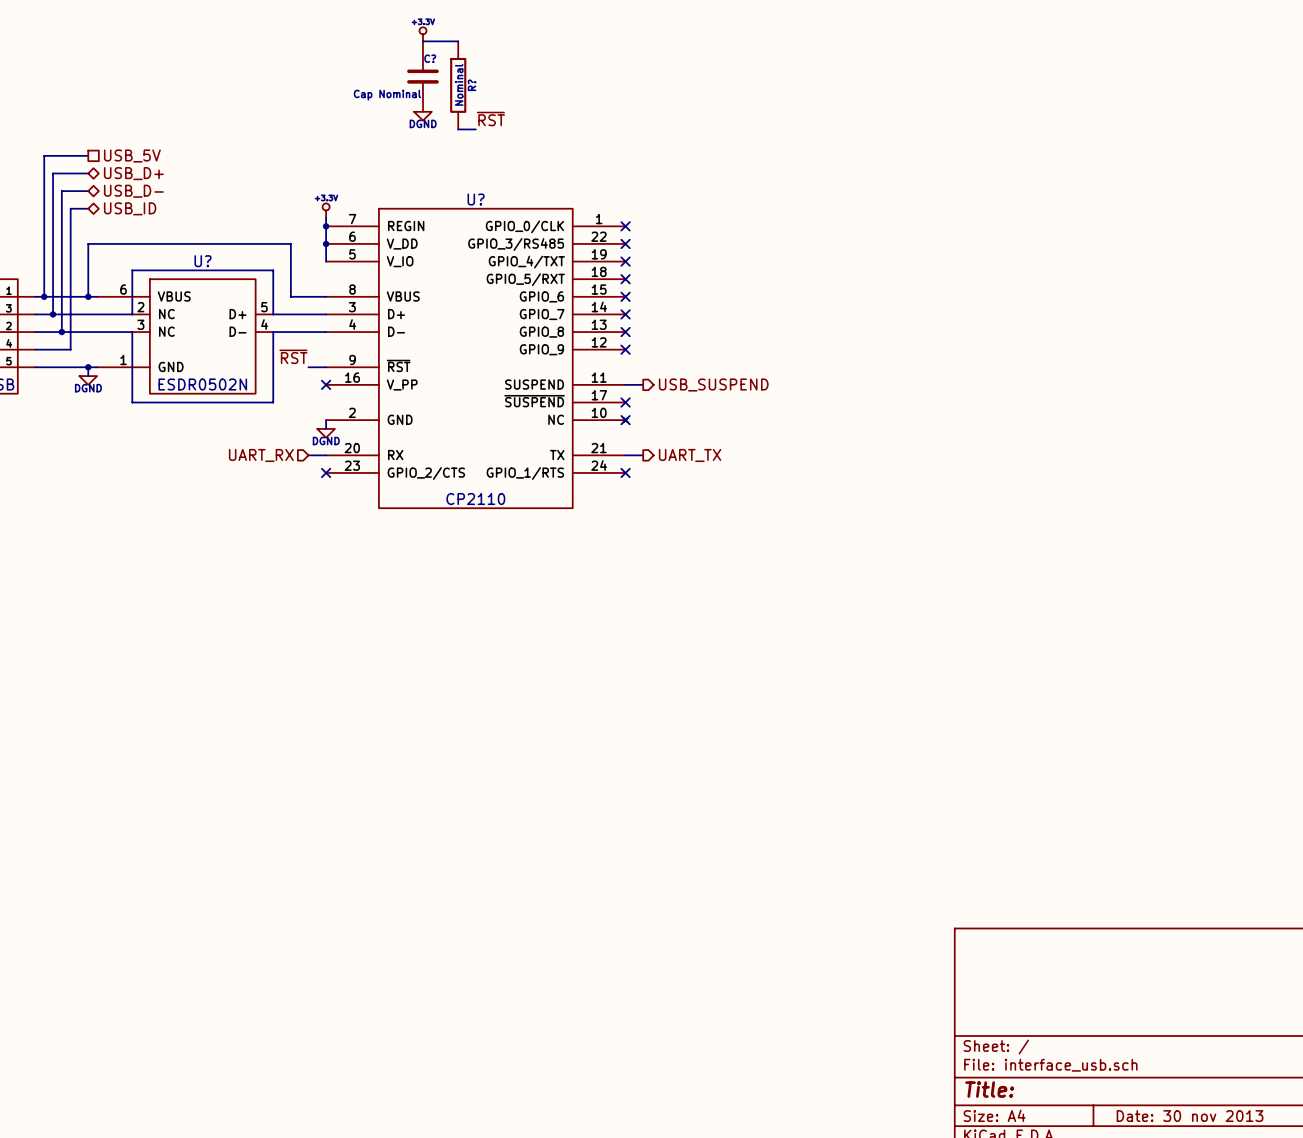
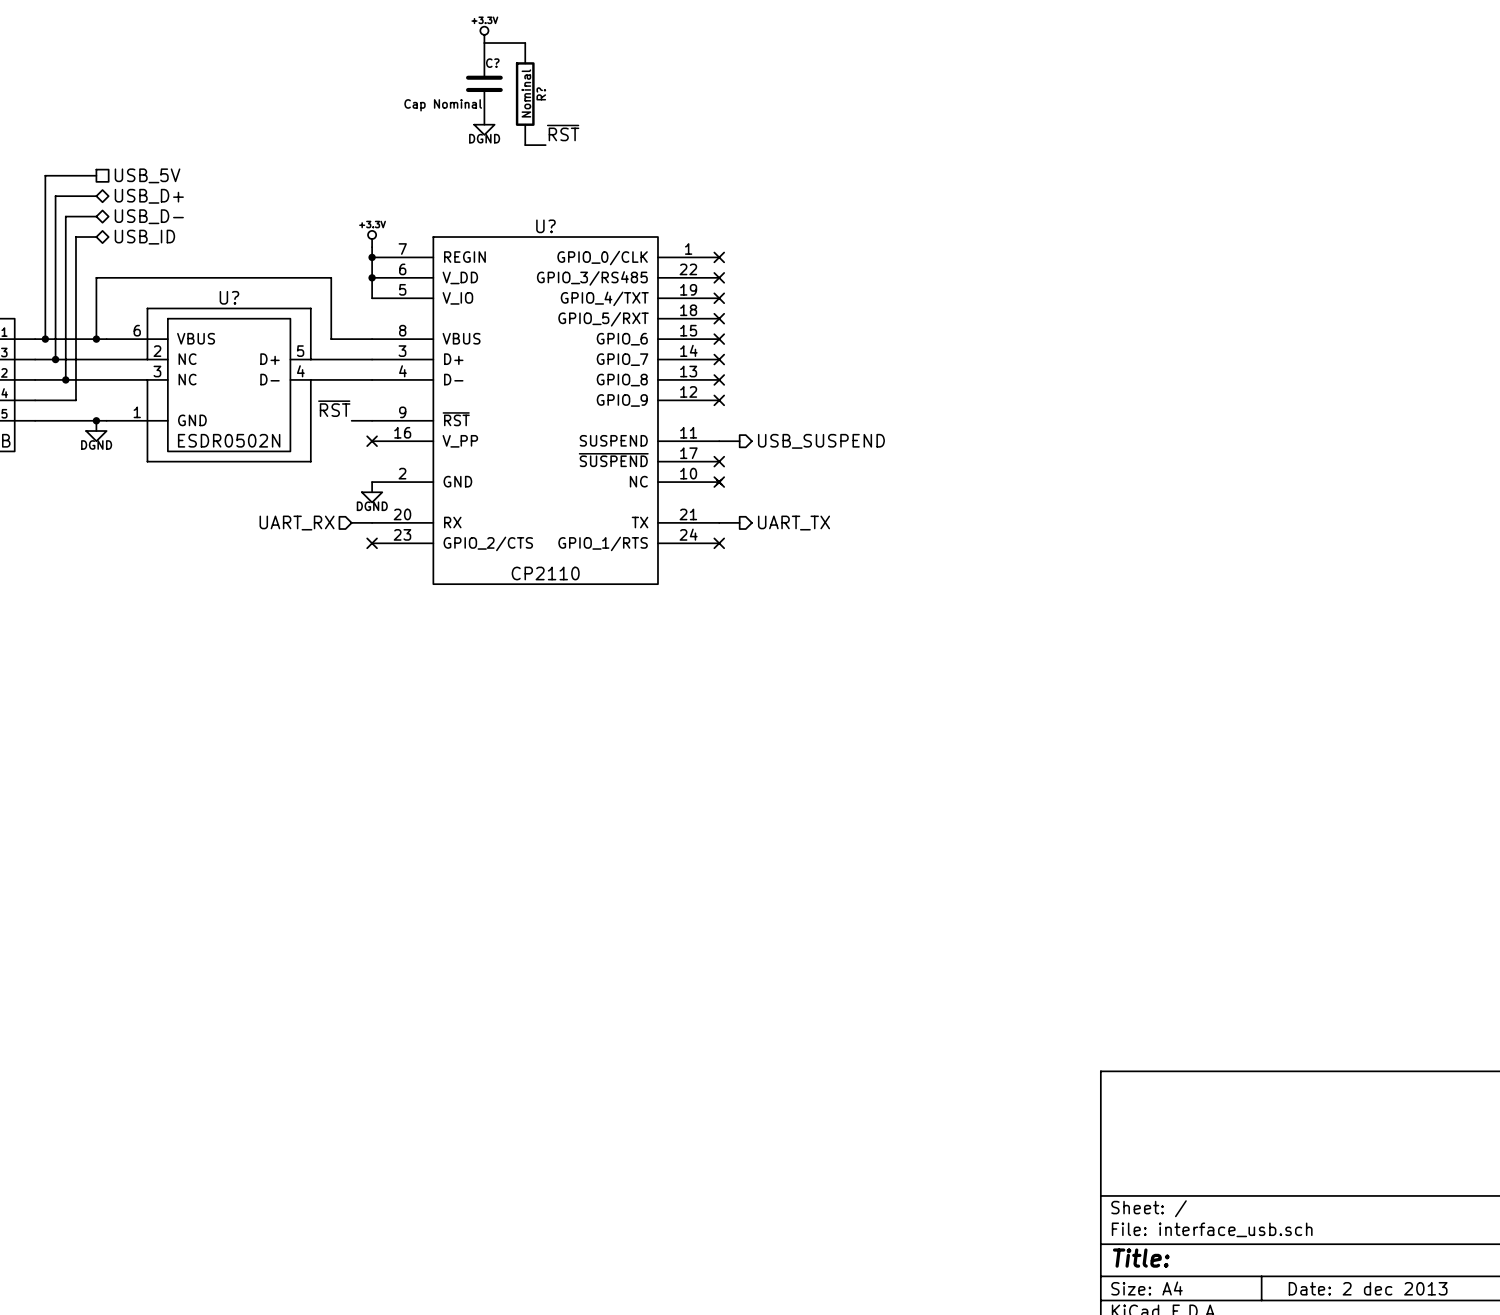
title block: Date: 30 nov 2013 (1190, 1116) -> Date: 2 dec 2013 (1368, 1288)

